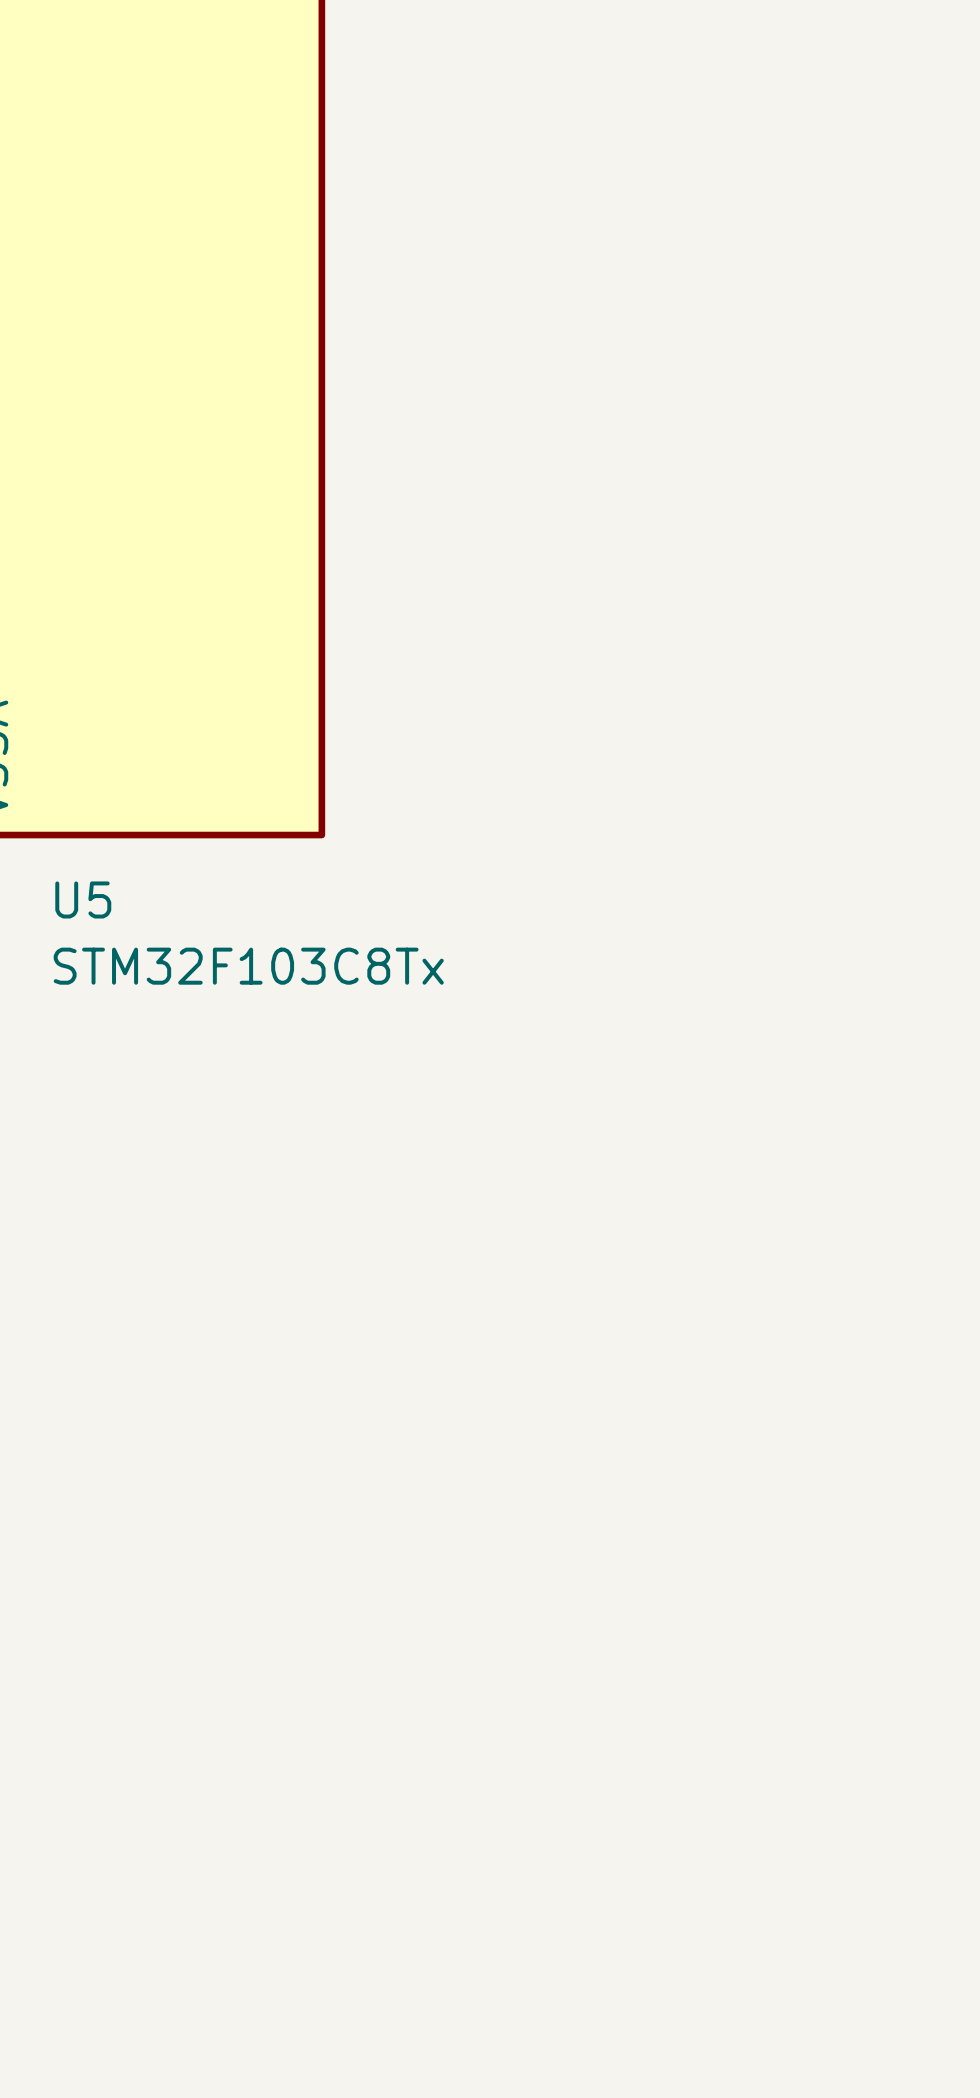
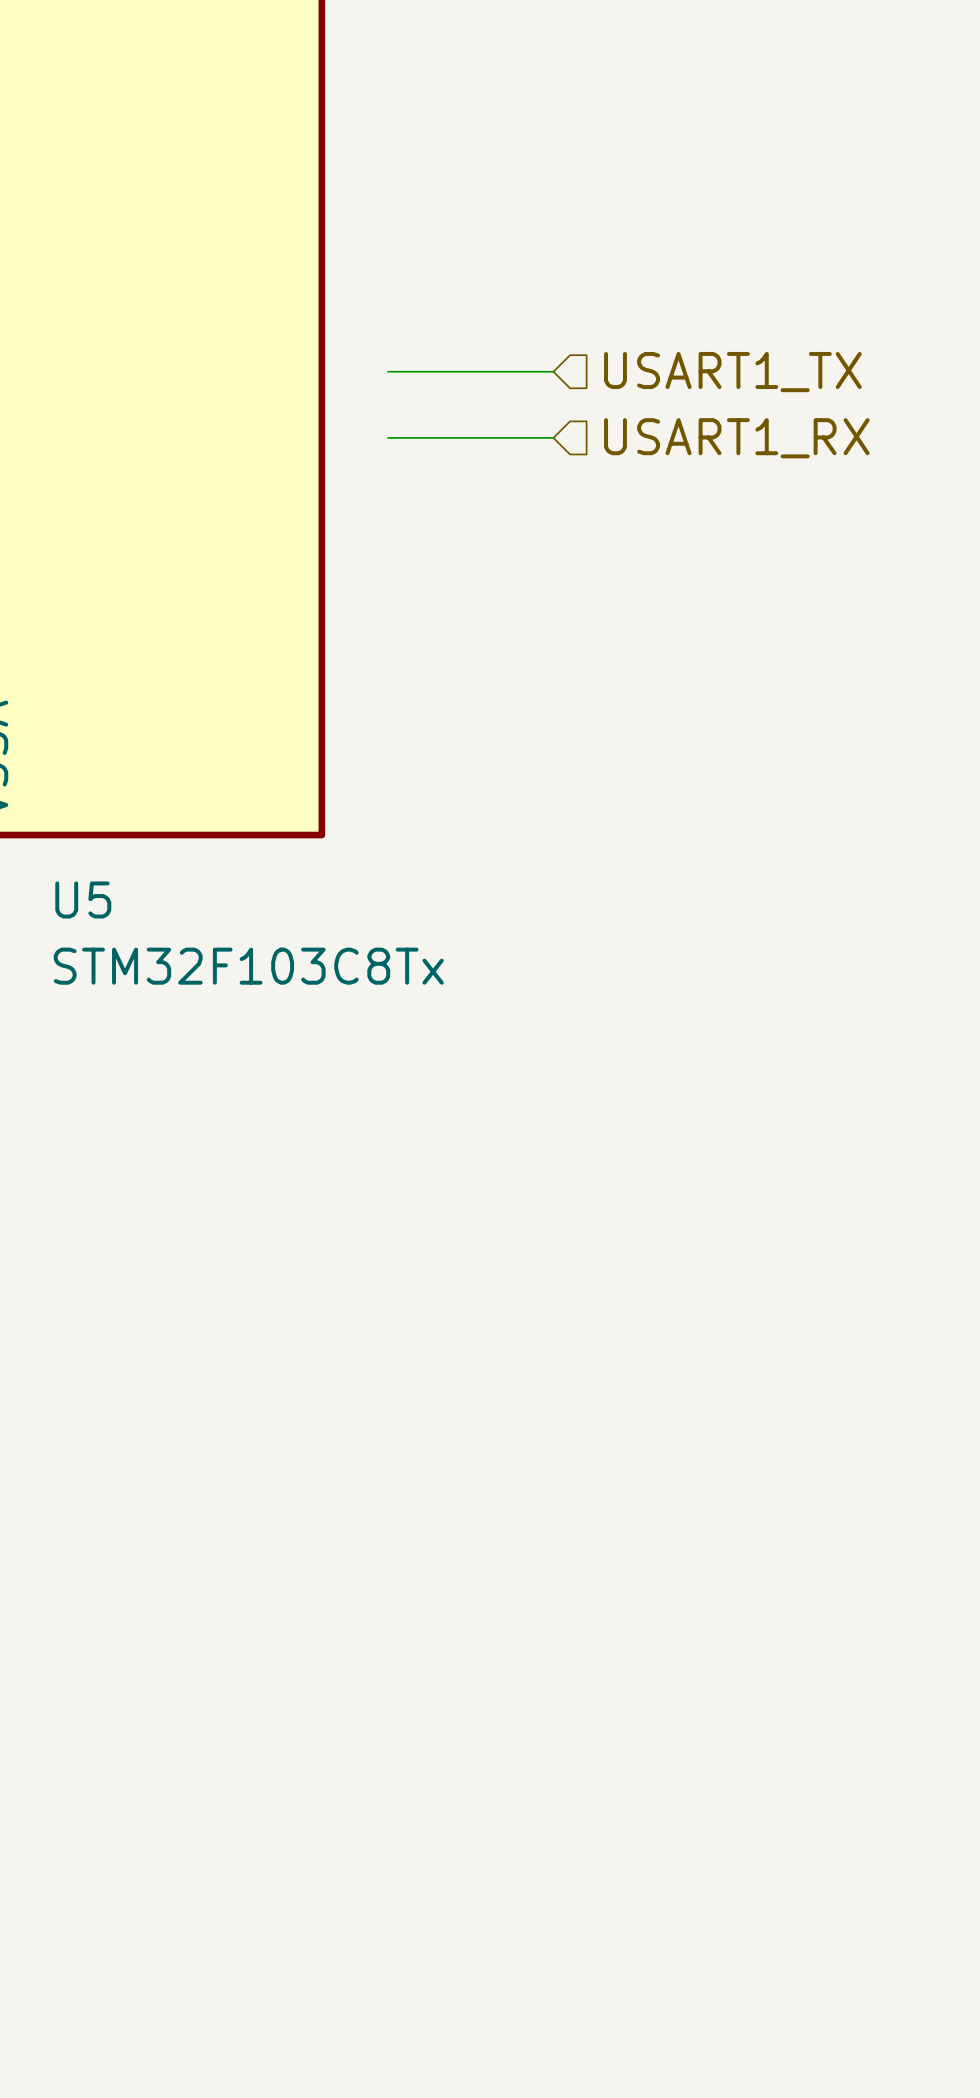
wire: none -> (388, 371) (553, 371)
hierarchical label: none -> USART1_TX (732, 372)
wire: none -> (388, 437) (553, 437)
hierarchical label: none -> USART1_RX (736, 438)

